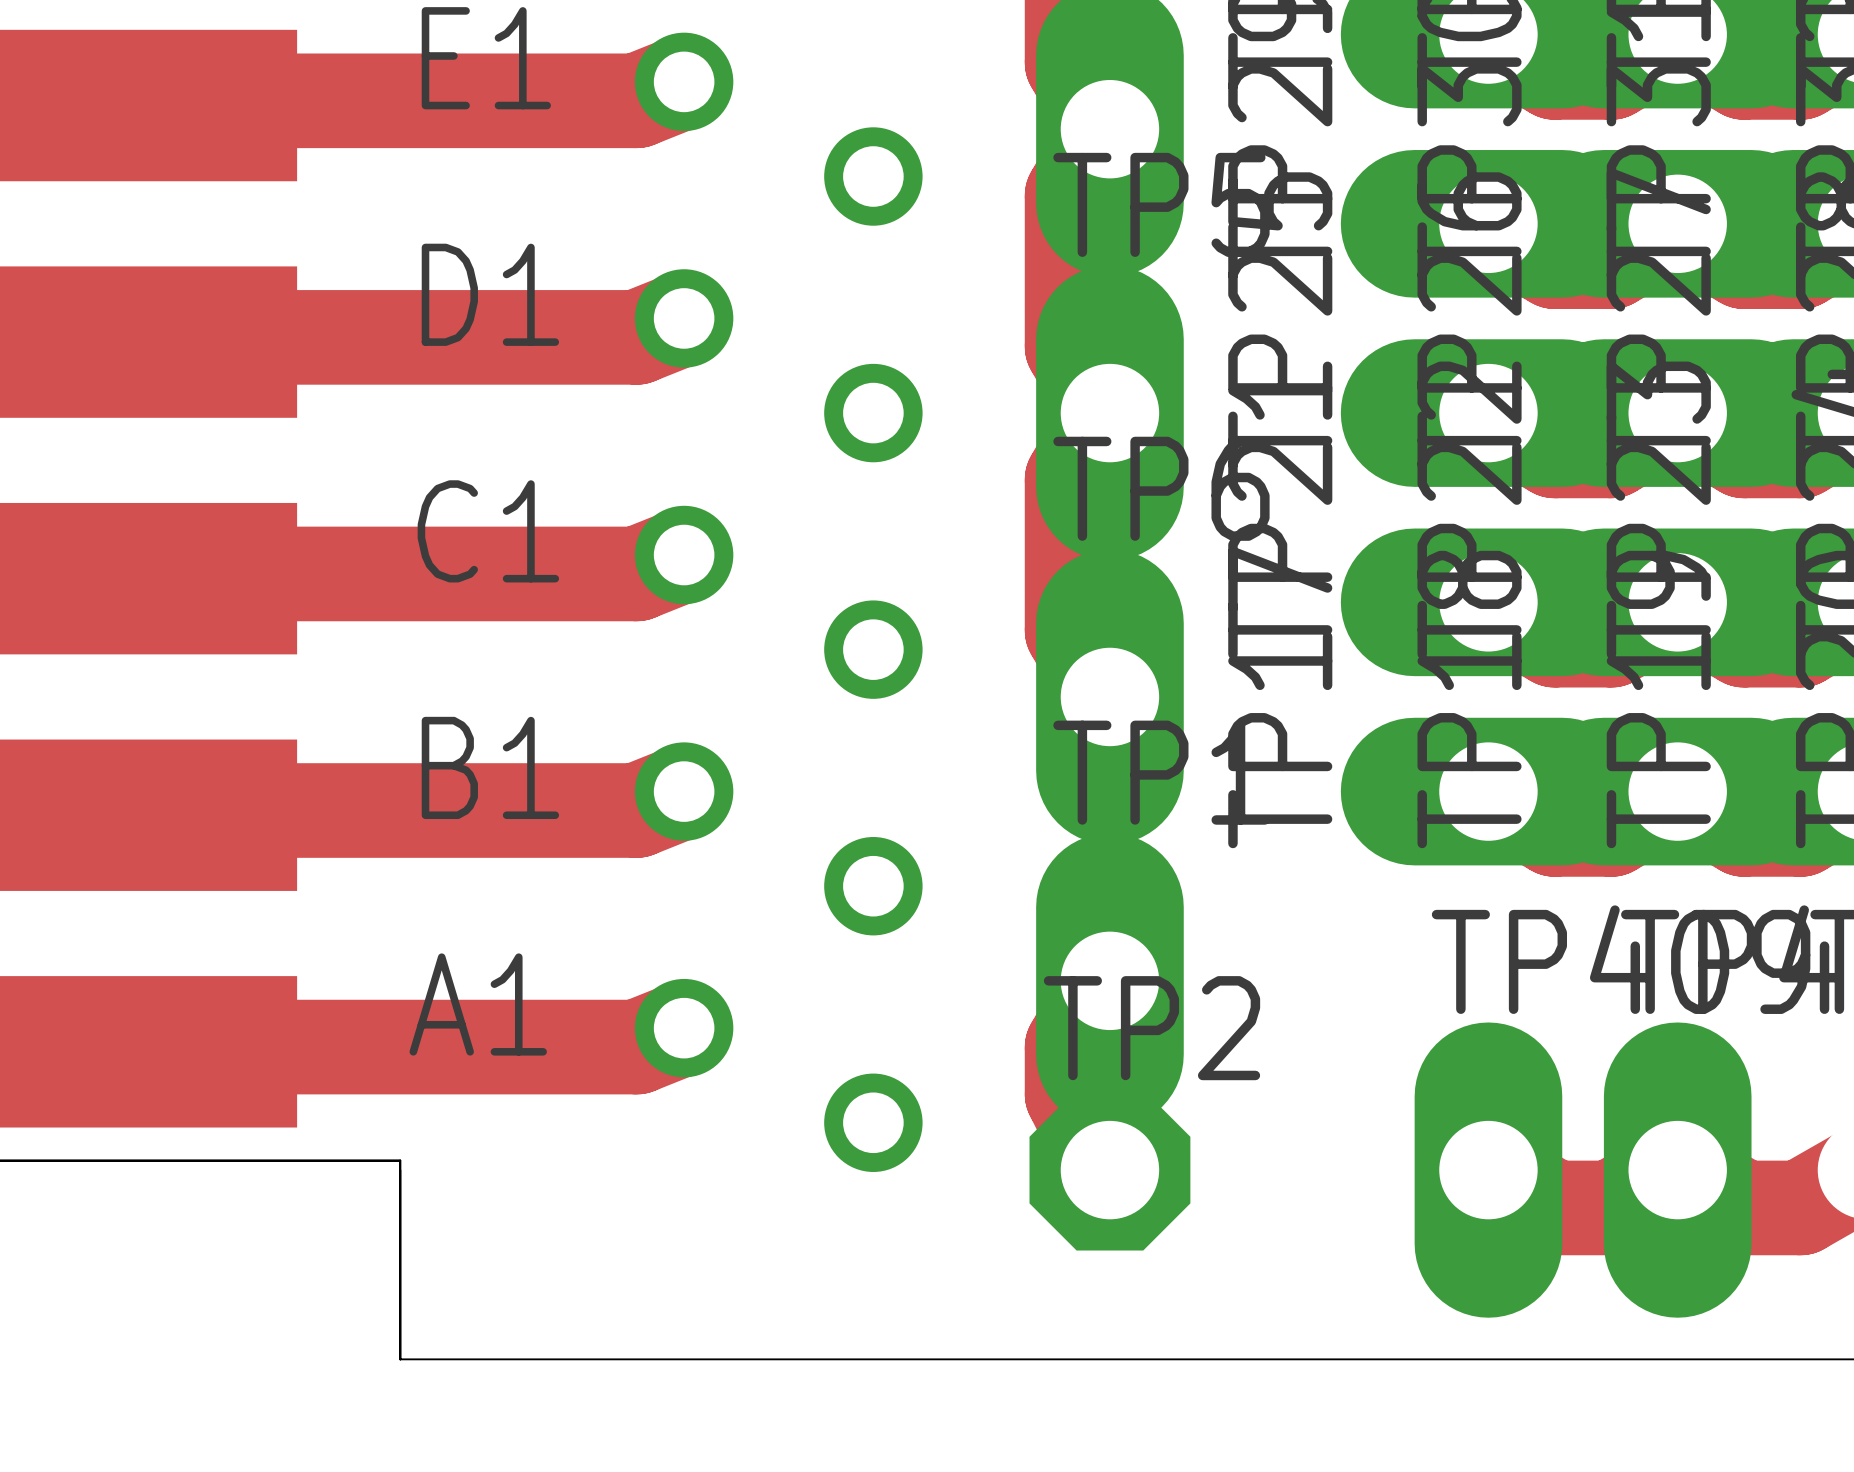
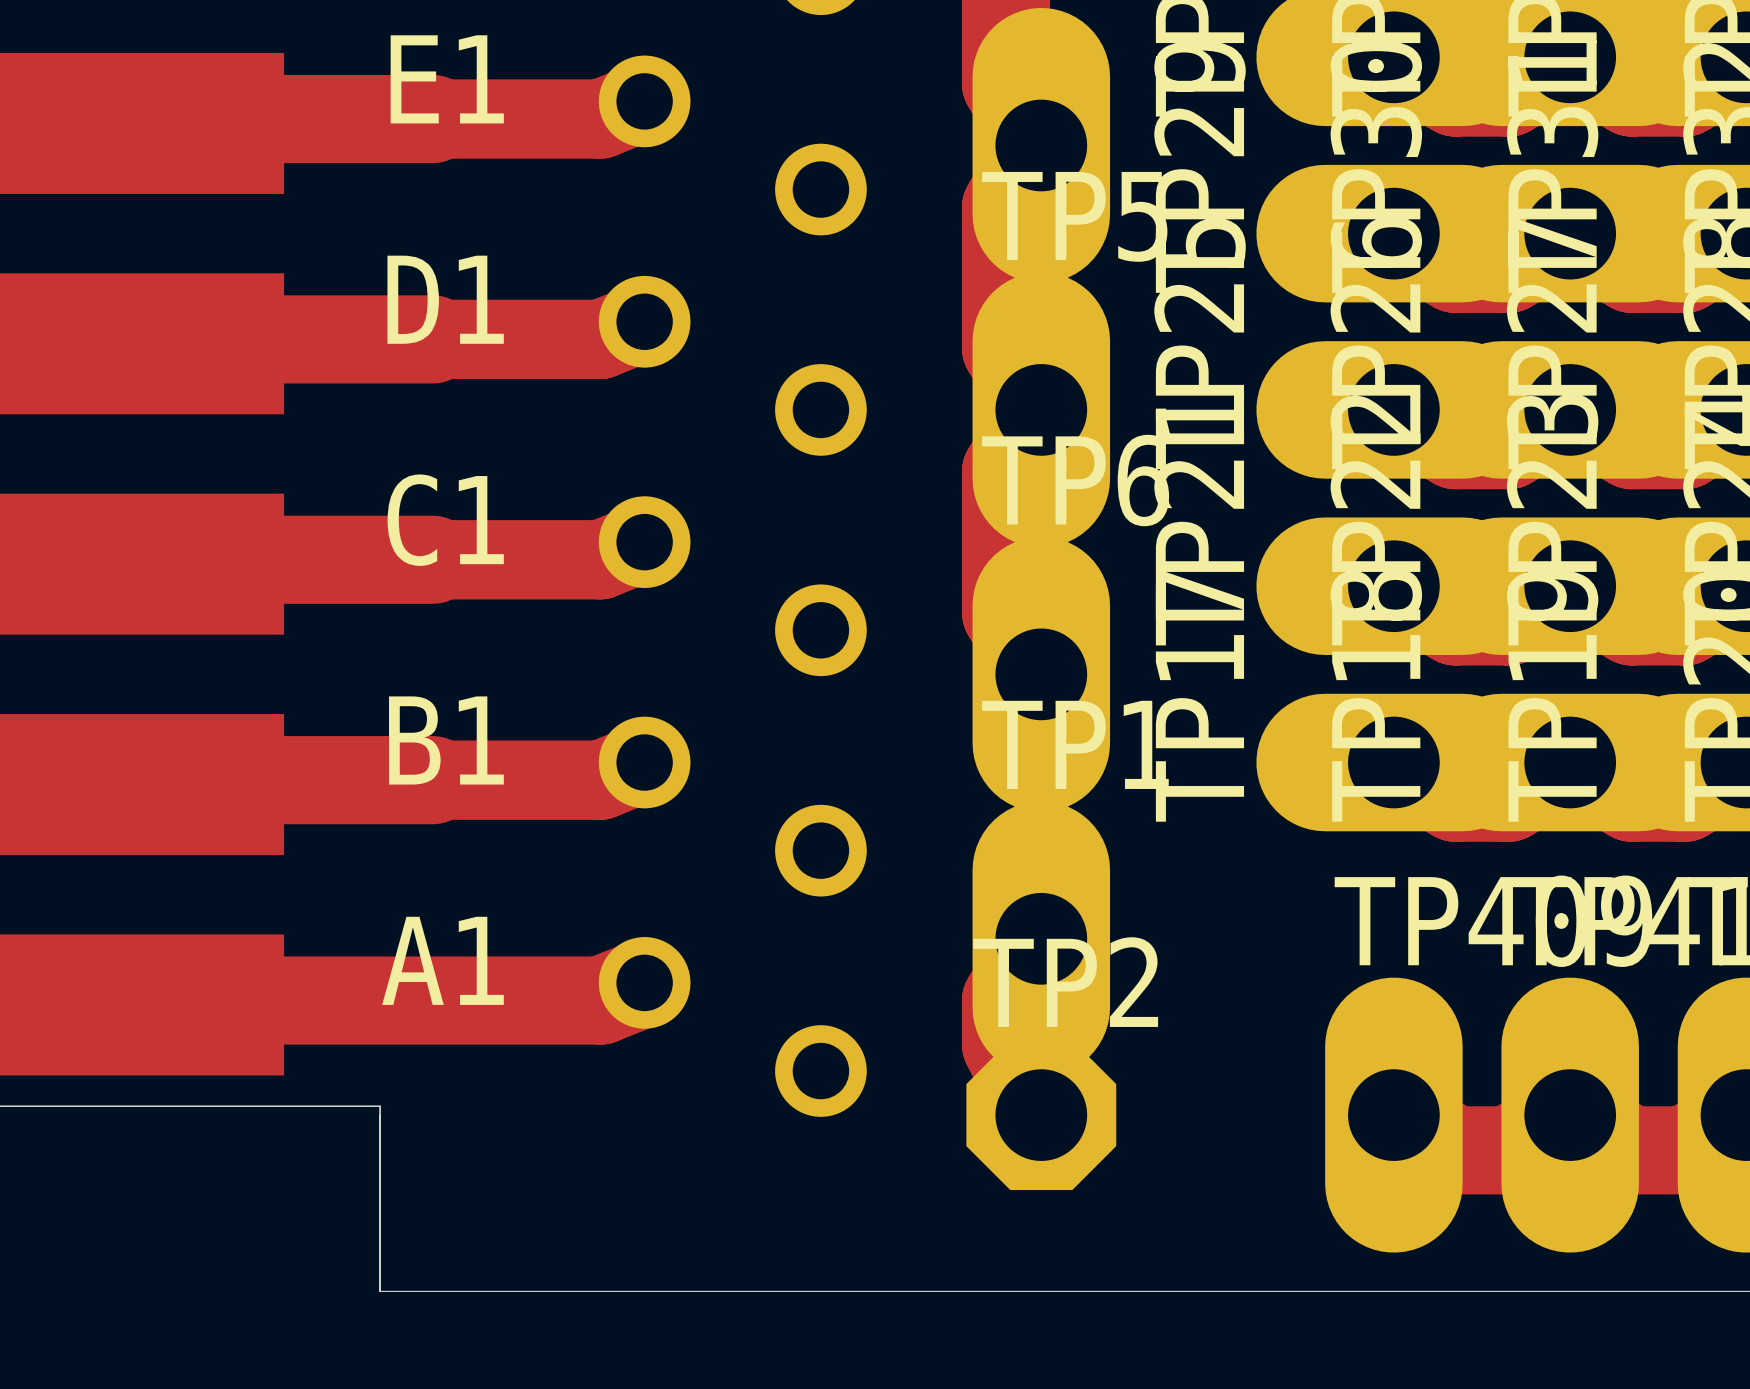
track width: thick (684, 81) (636, 100) (457, 100) -> thin (644, 101) (600, 119) (433, 119)
track width: thick (684, 318) (636, 337) (457, 337) -> thin (644, 321) (600, 339) (433, 339)
track width: thick (684, 555) (636, 573) (457, 573) -> thin (644, 542) (600, 559) (433, 559)
track width: thick (684, 791) (636, 810) (457, 810) -> thin (644, 762) (600, 780) (433, 780)

